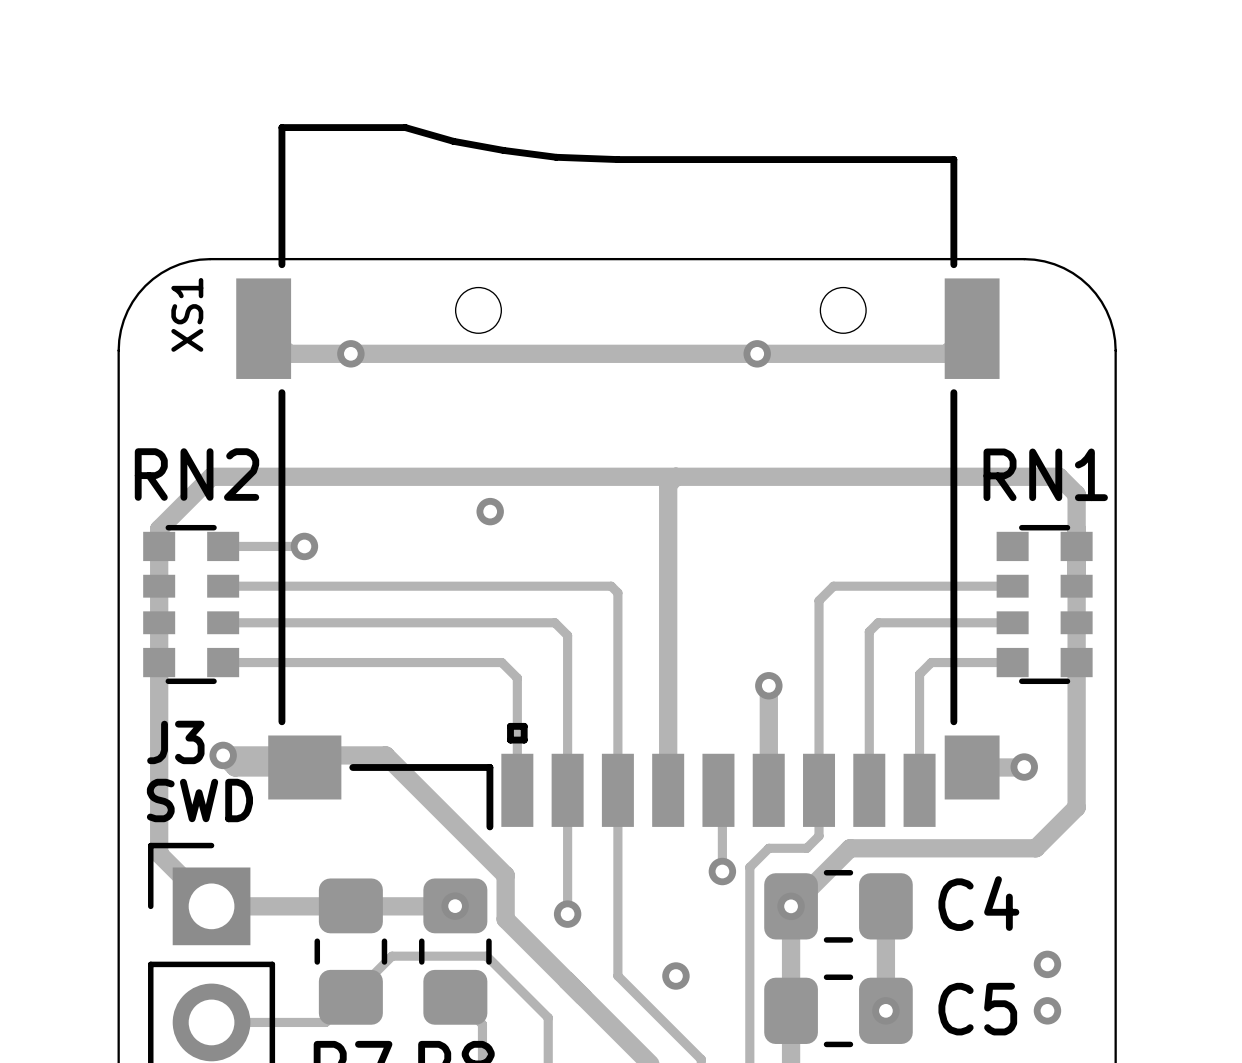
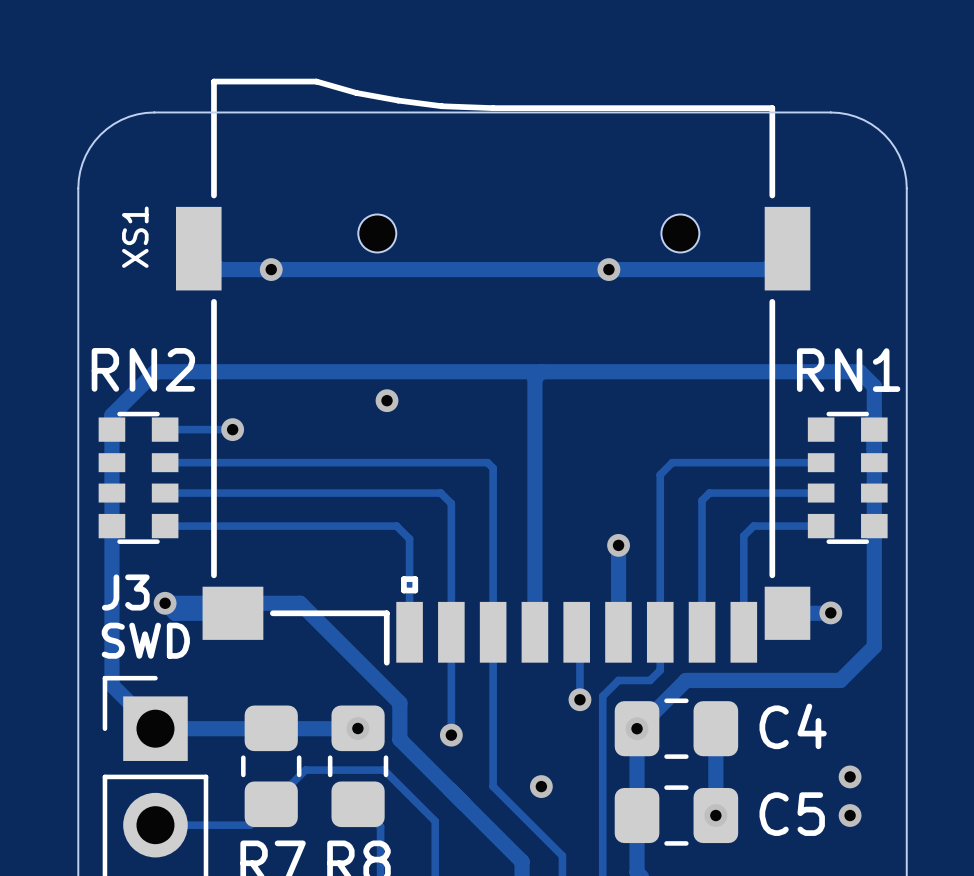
board edge: (118, 350) (123, 320) (132, 301) (145, 285) (170, 268) (189, 261) (210, 259) (1034, 259) (1063, 268) (1081, 279) (1095, 293) (1110, 320) (1115, 350) -> (78, 266) (78, 179) (85, 155) (94, 141) (113, 124) (129, 116) (154, 112) (830, 112) (847, 114) (863, 120) (878, 129) (895, 148) (902, 163) (906, 188) (906, 266)

